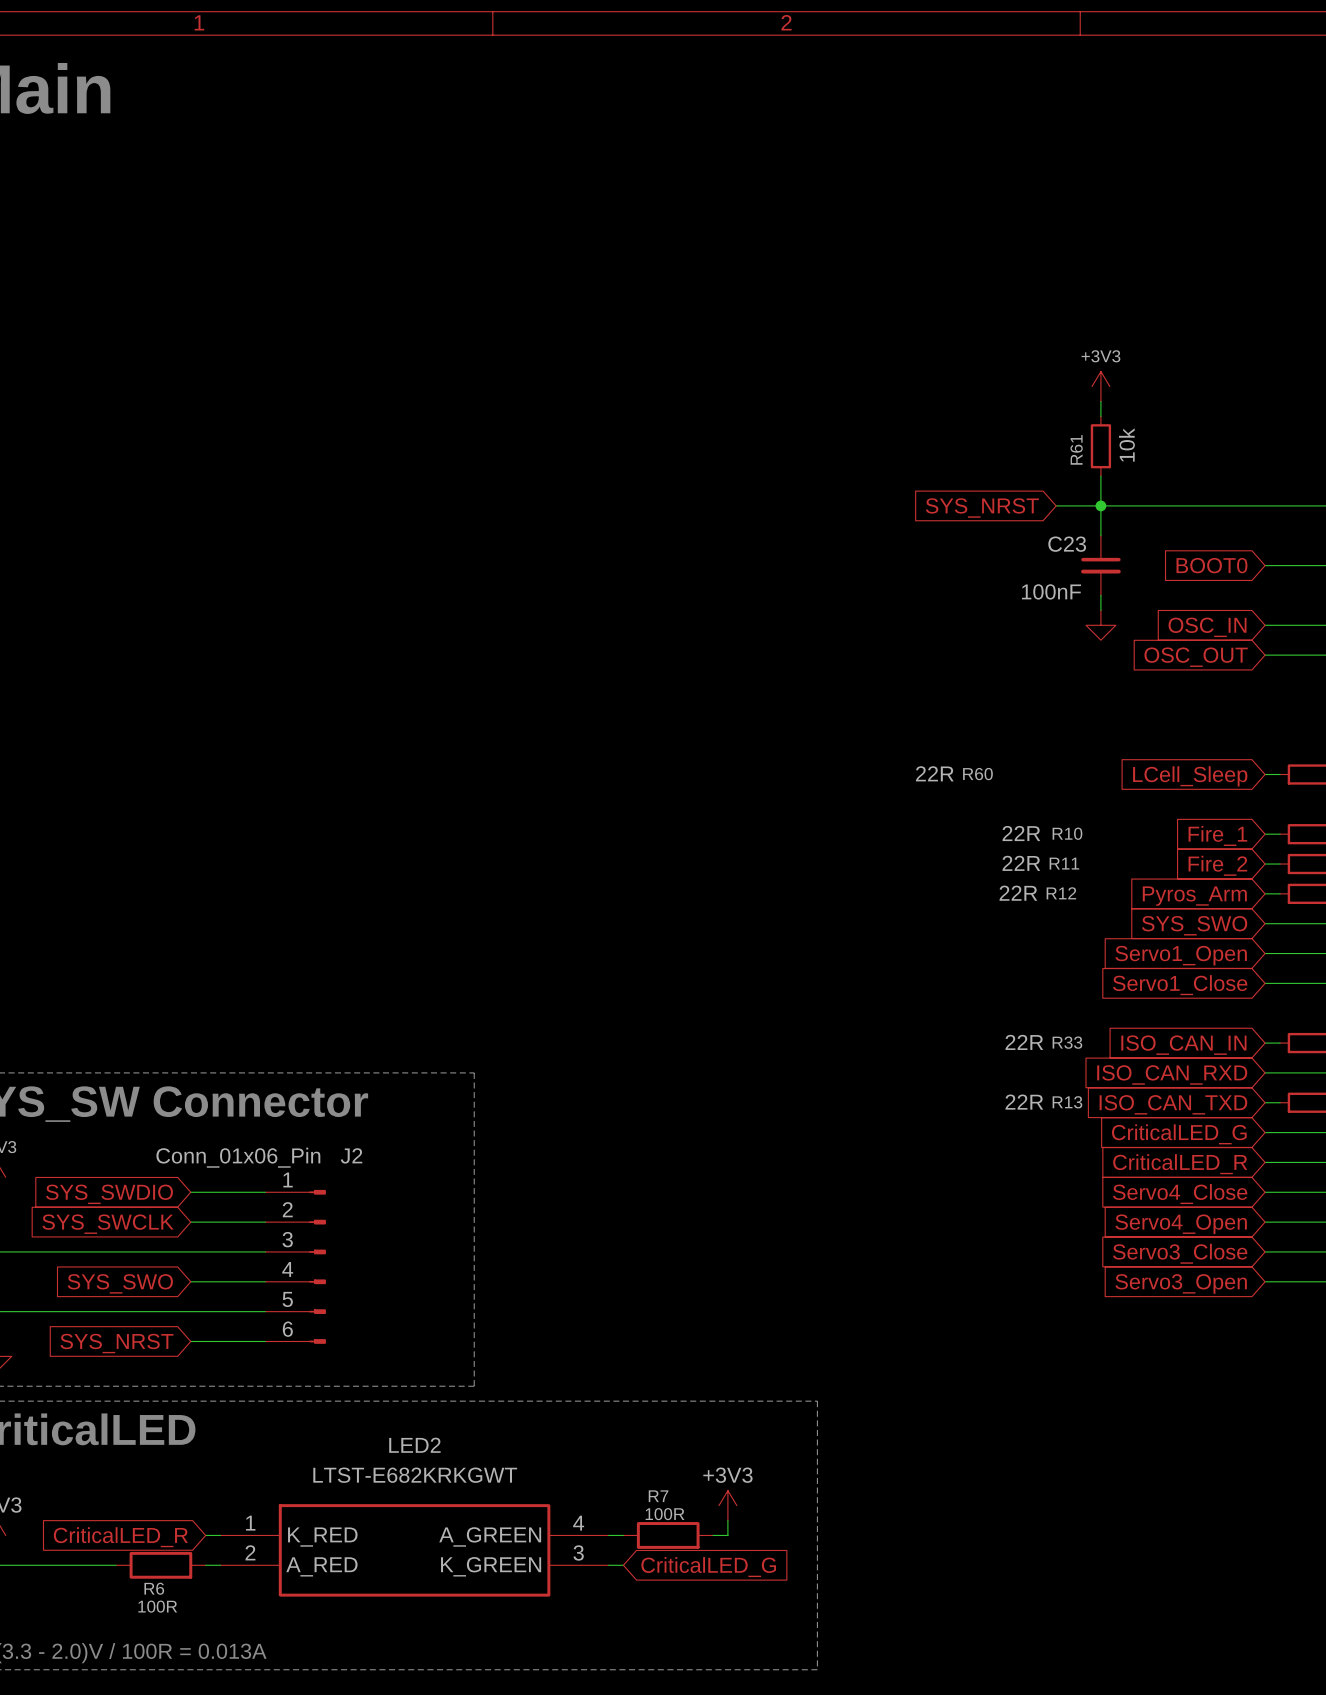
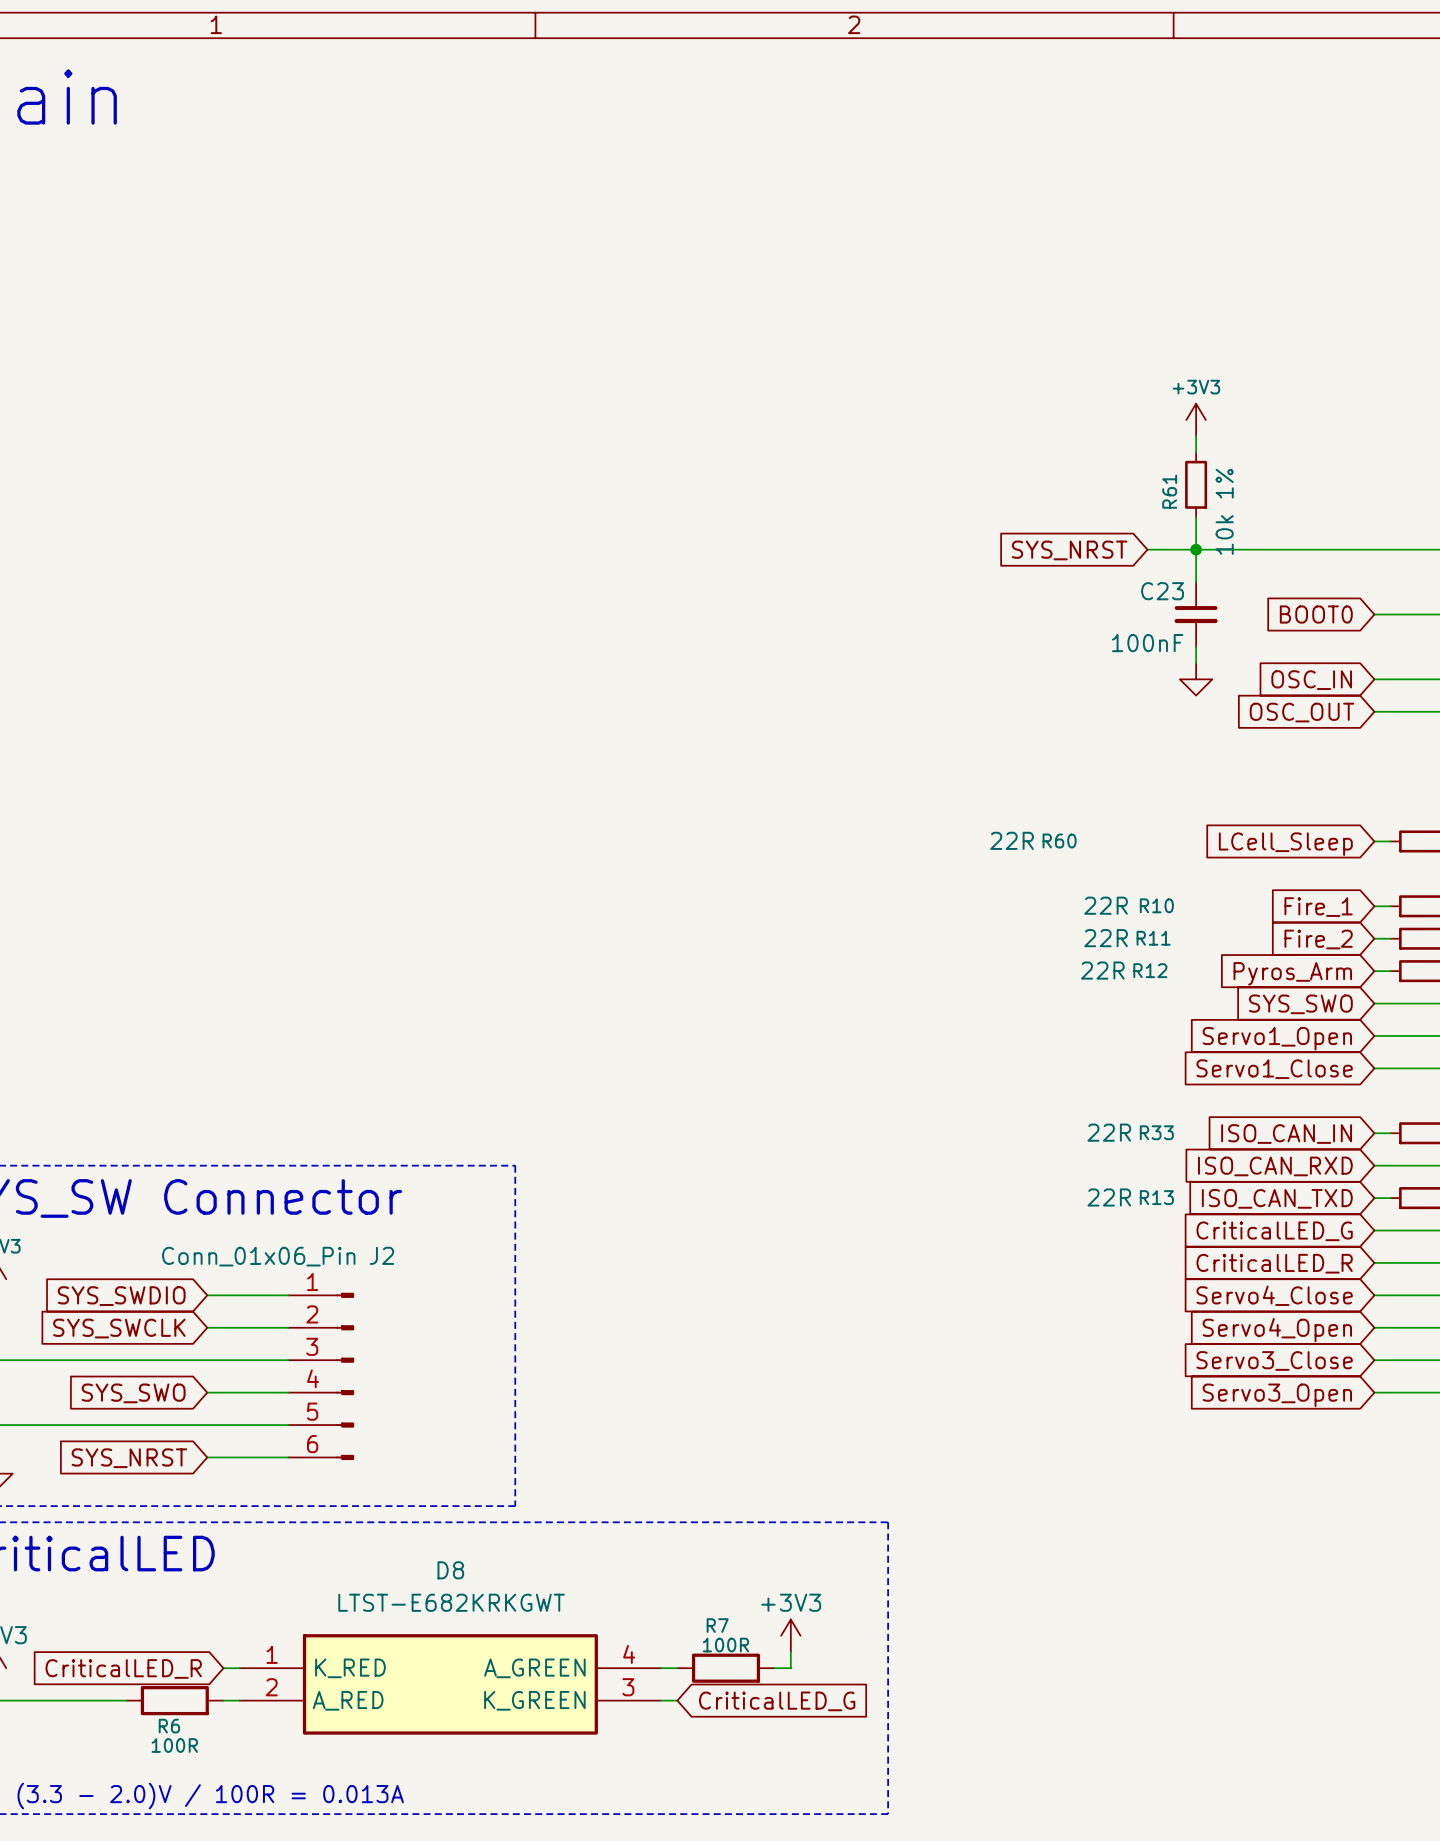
R61 value: 10k (1126, 444) -> 10k 1% (1224, 511)
LED2 name: LED2 (414, 1445) -> D8 (450, 1570)

